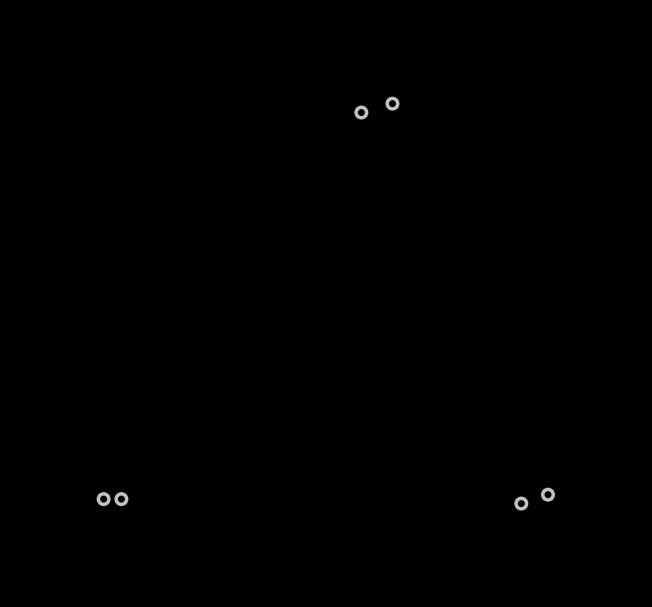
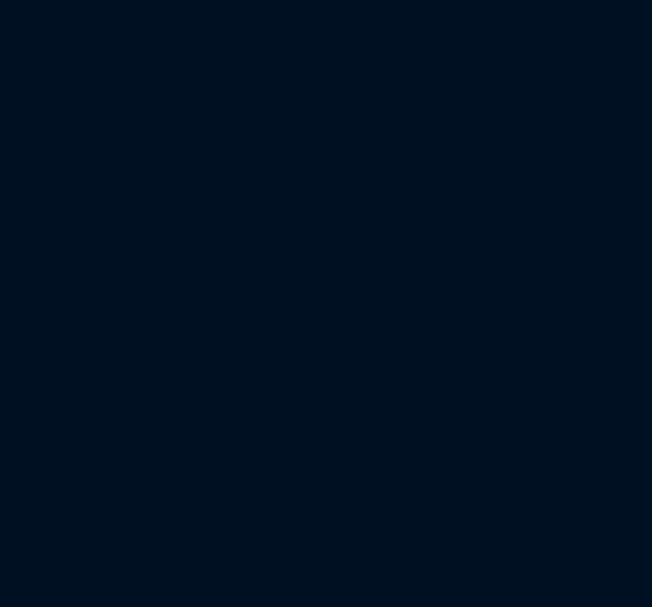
via: (392, 103) -> none
via: (361, 112) -> none
via: (547, 494) -> none
via: (103, 499) -> none
via: (121, 499) -> none
via: (521, 503) -> none

